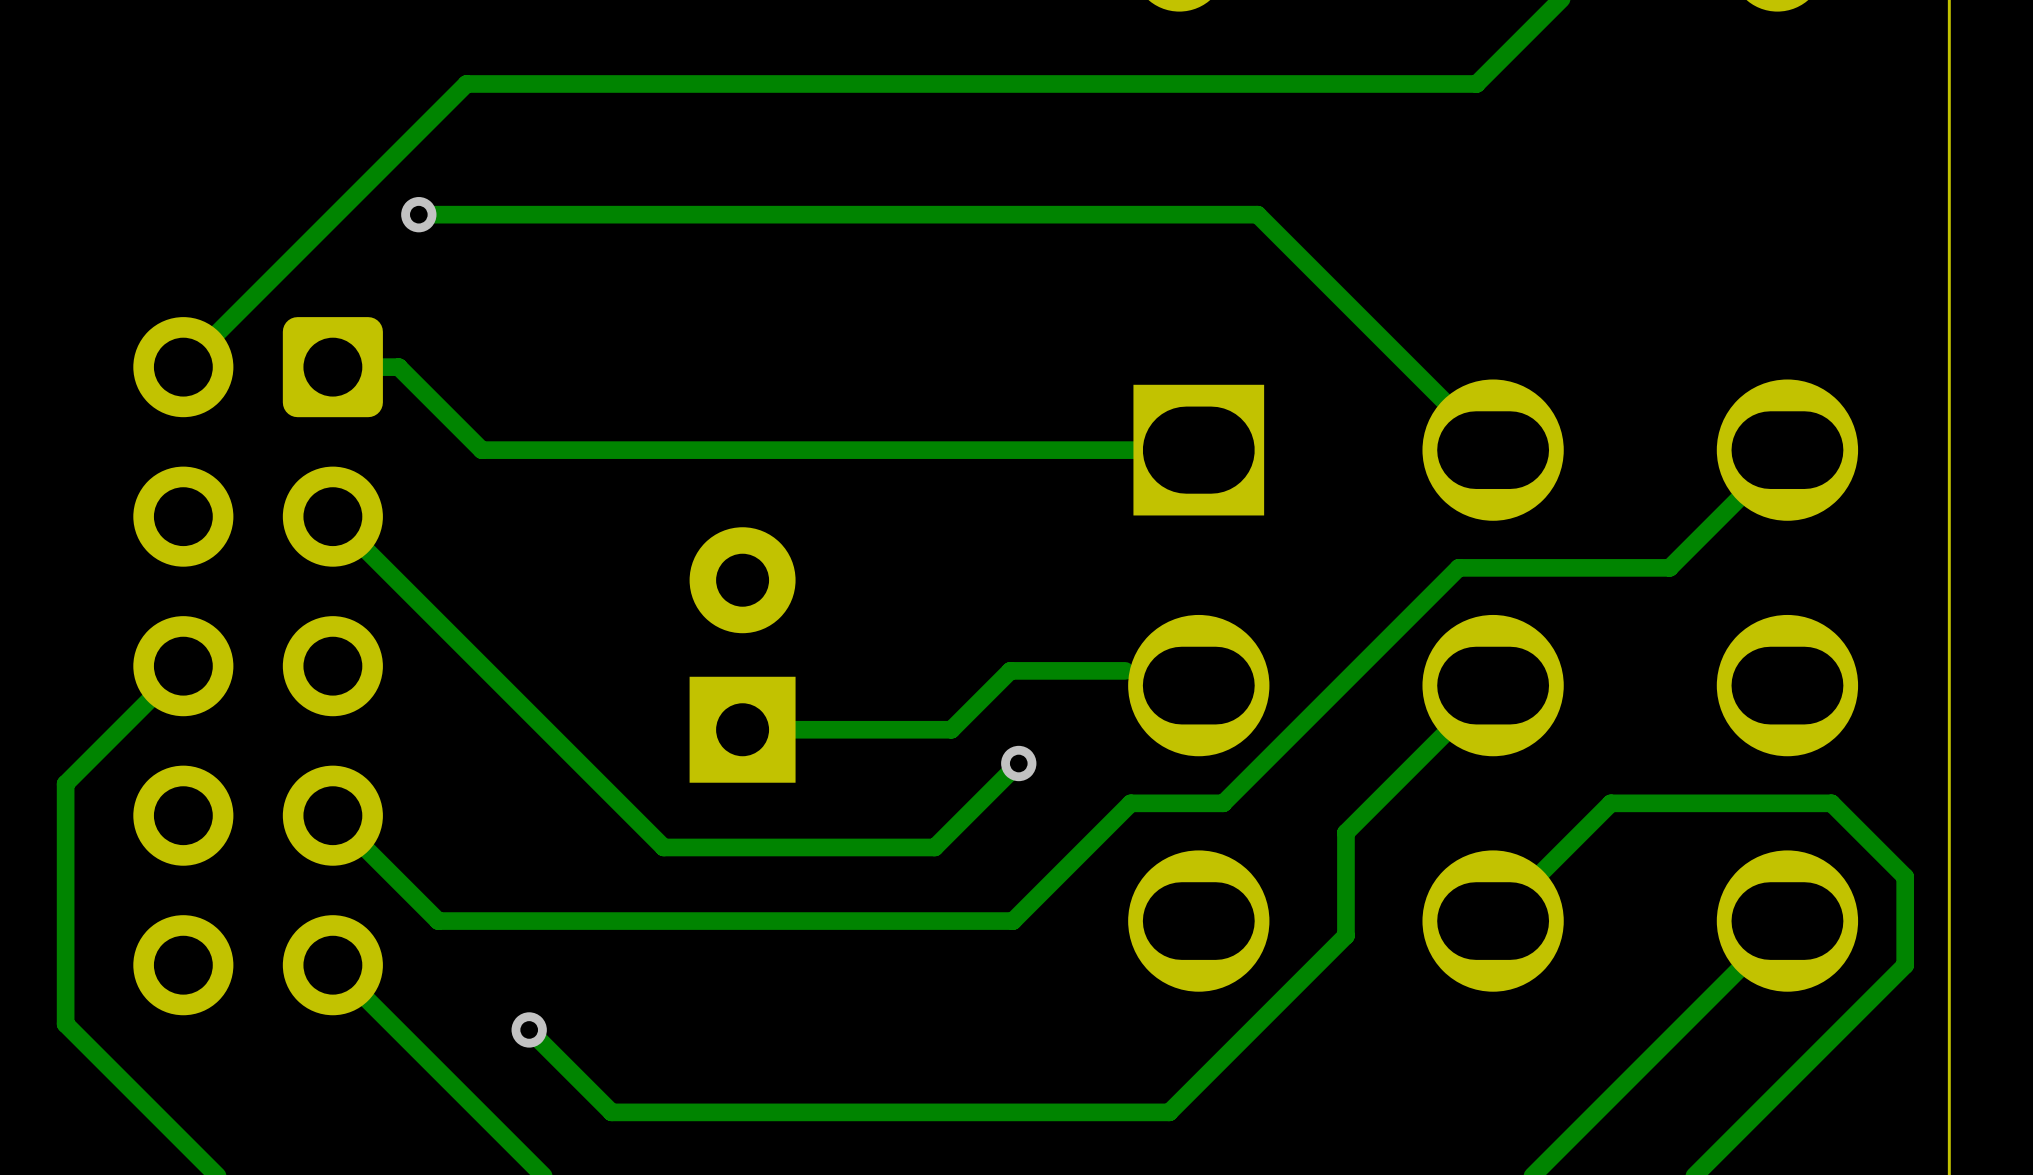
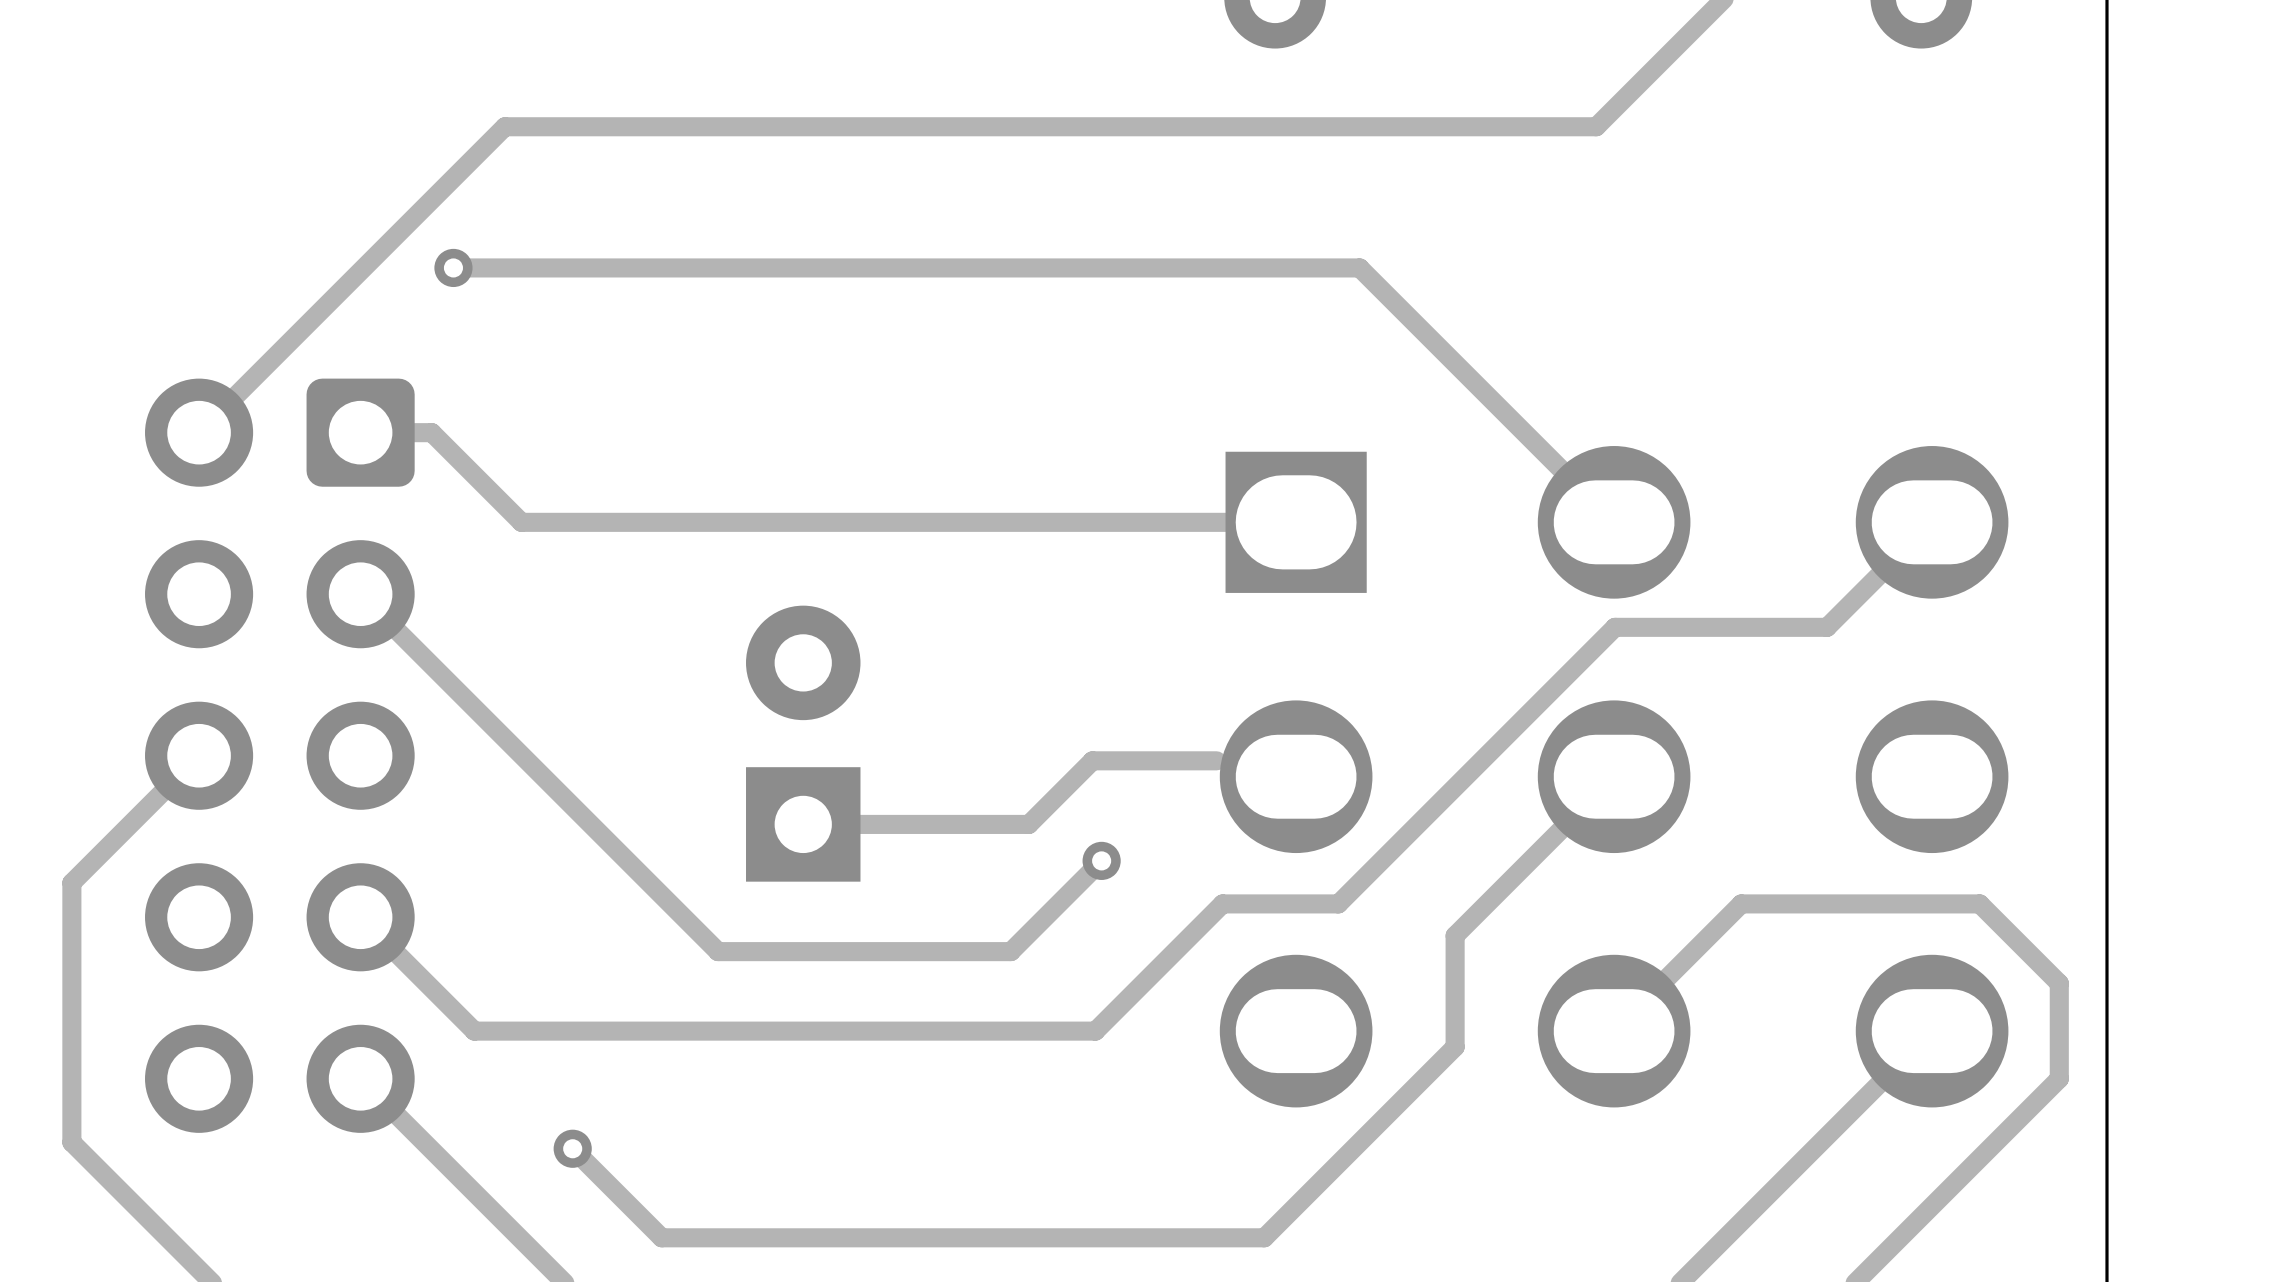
track: (1690, 547) (1669, 567) (1458, 567) (1223, 803) -> (1827, 627) (1615, 627) (1338, 903) (1322, 903)

